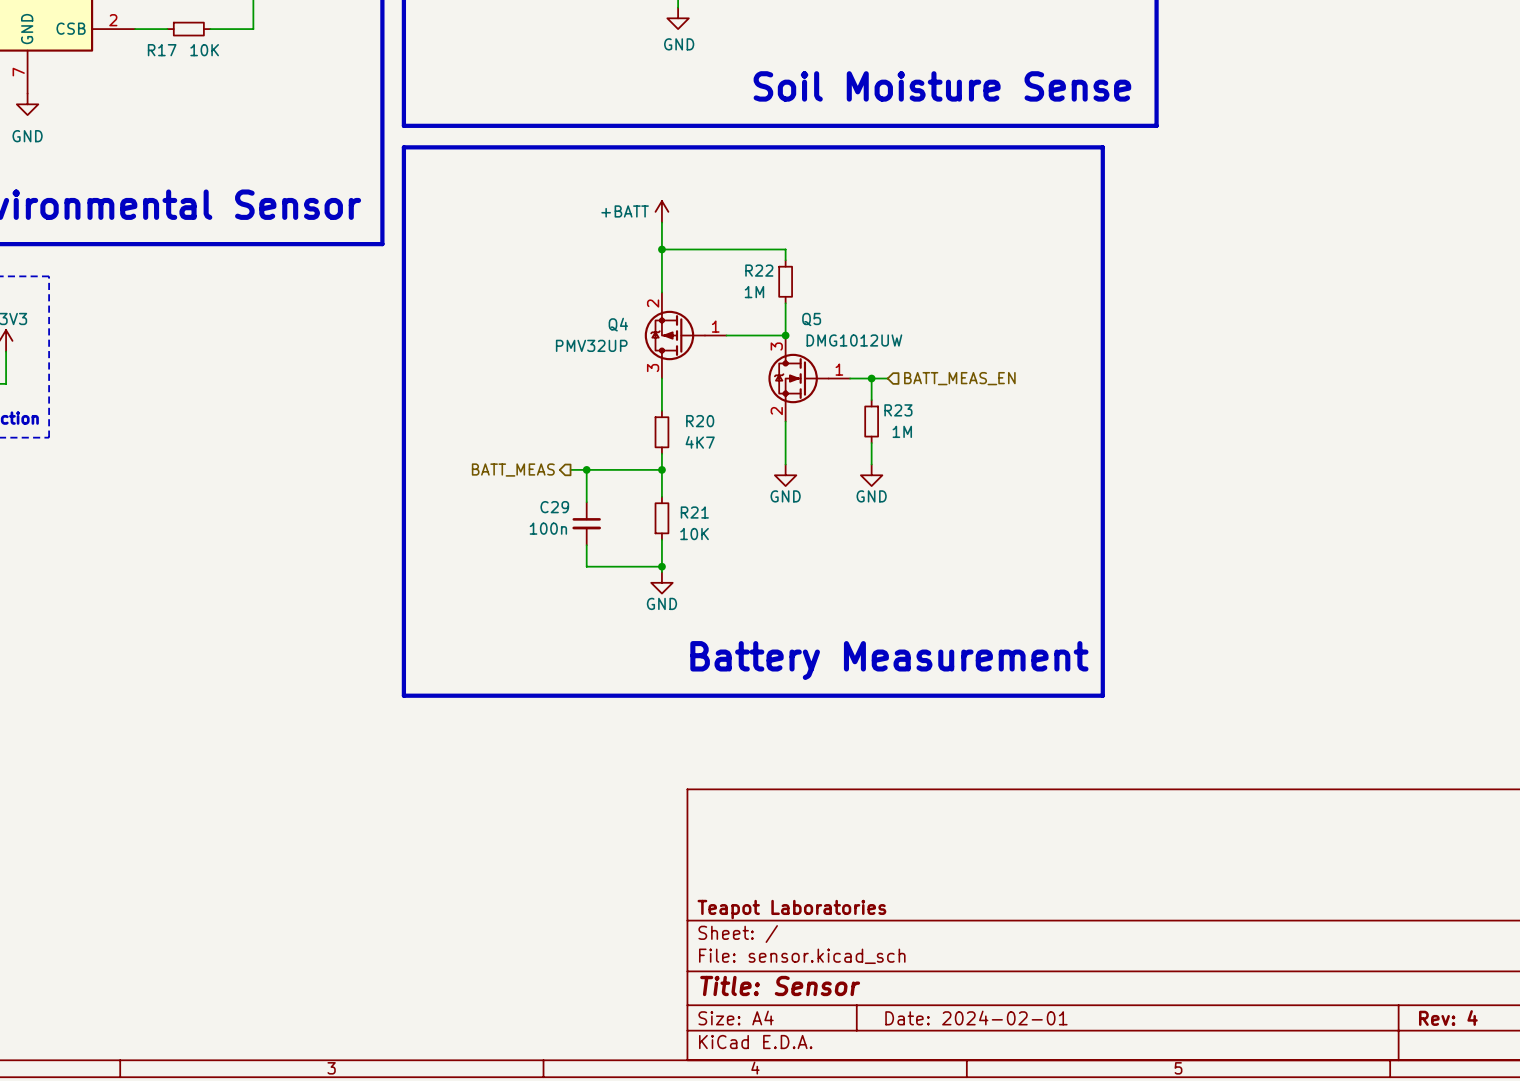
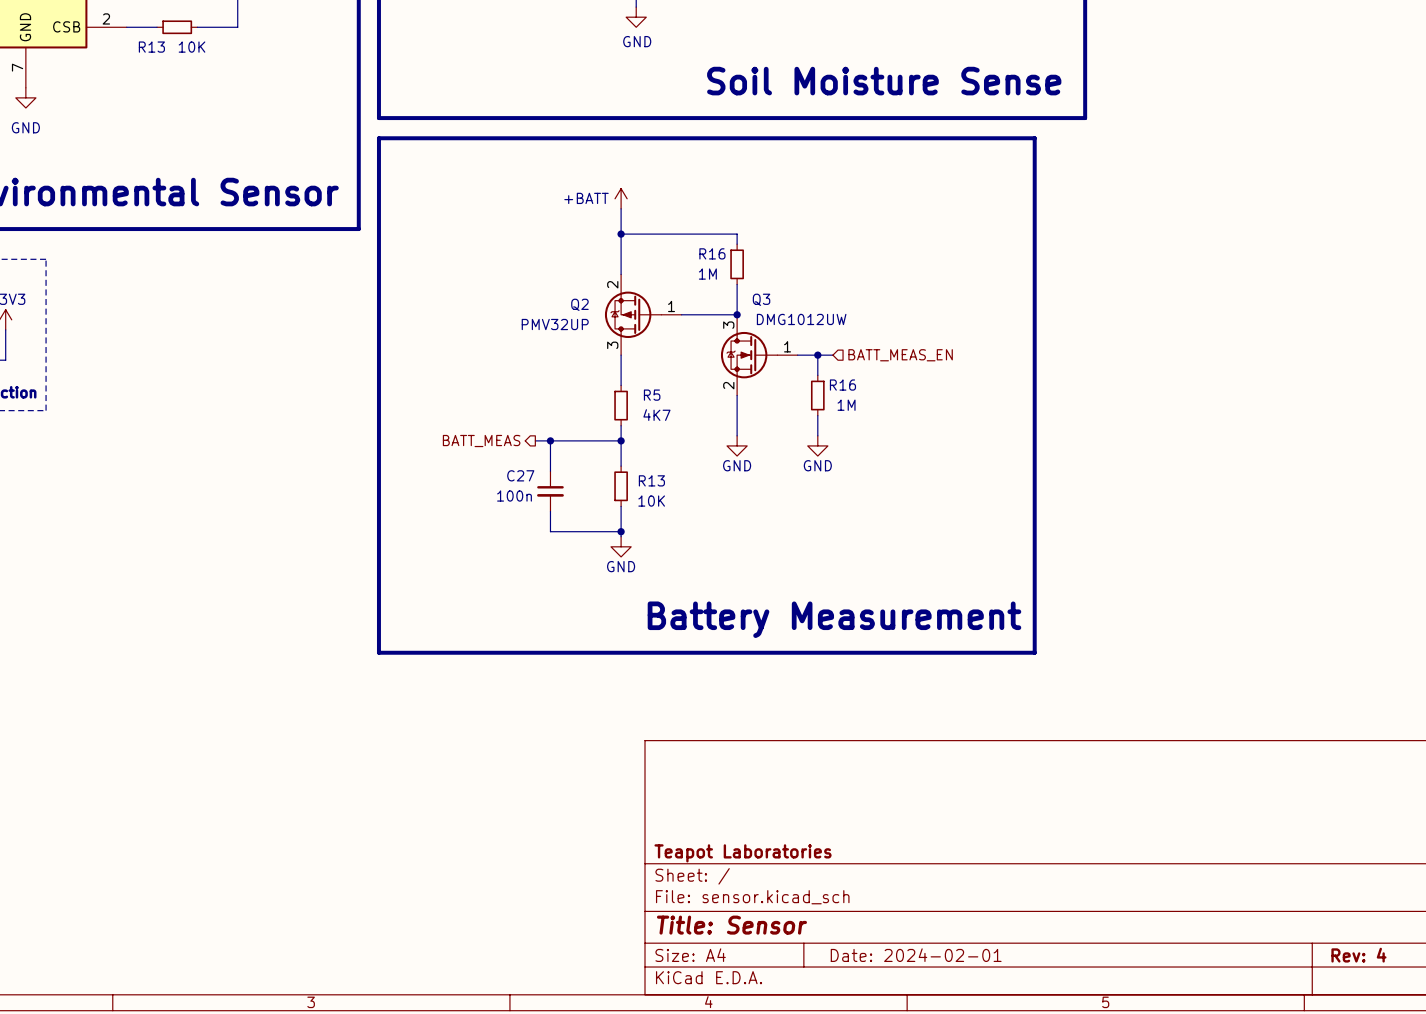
R17 name: R17 (162, 50) -> R13 (151, 47)
R22 name: R22 (759, 270) -> R16 (712, 253)
Q5 name: Q5 (811, 319) -> Q3 (761, 299)
Q4 name: Q4 (618, 324) -> Q2 (579, 304)
R23 name: R23 (898, 410) -> R16 (842, 385)
R20 name: R20 (700, 421) -> R5 (652, 395)
C29 name: C29 (554, 507) -> C27 (520, 475)
R21 name: R21 (694, 512) -> R13 (651, 480)

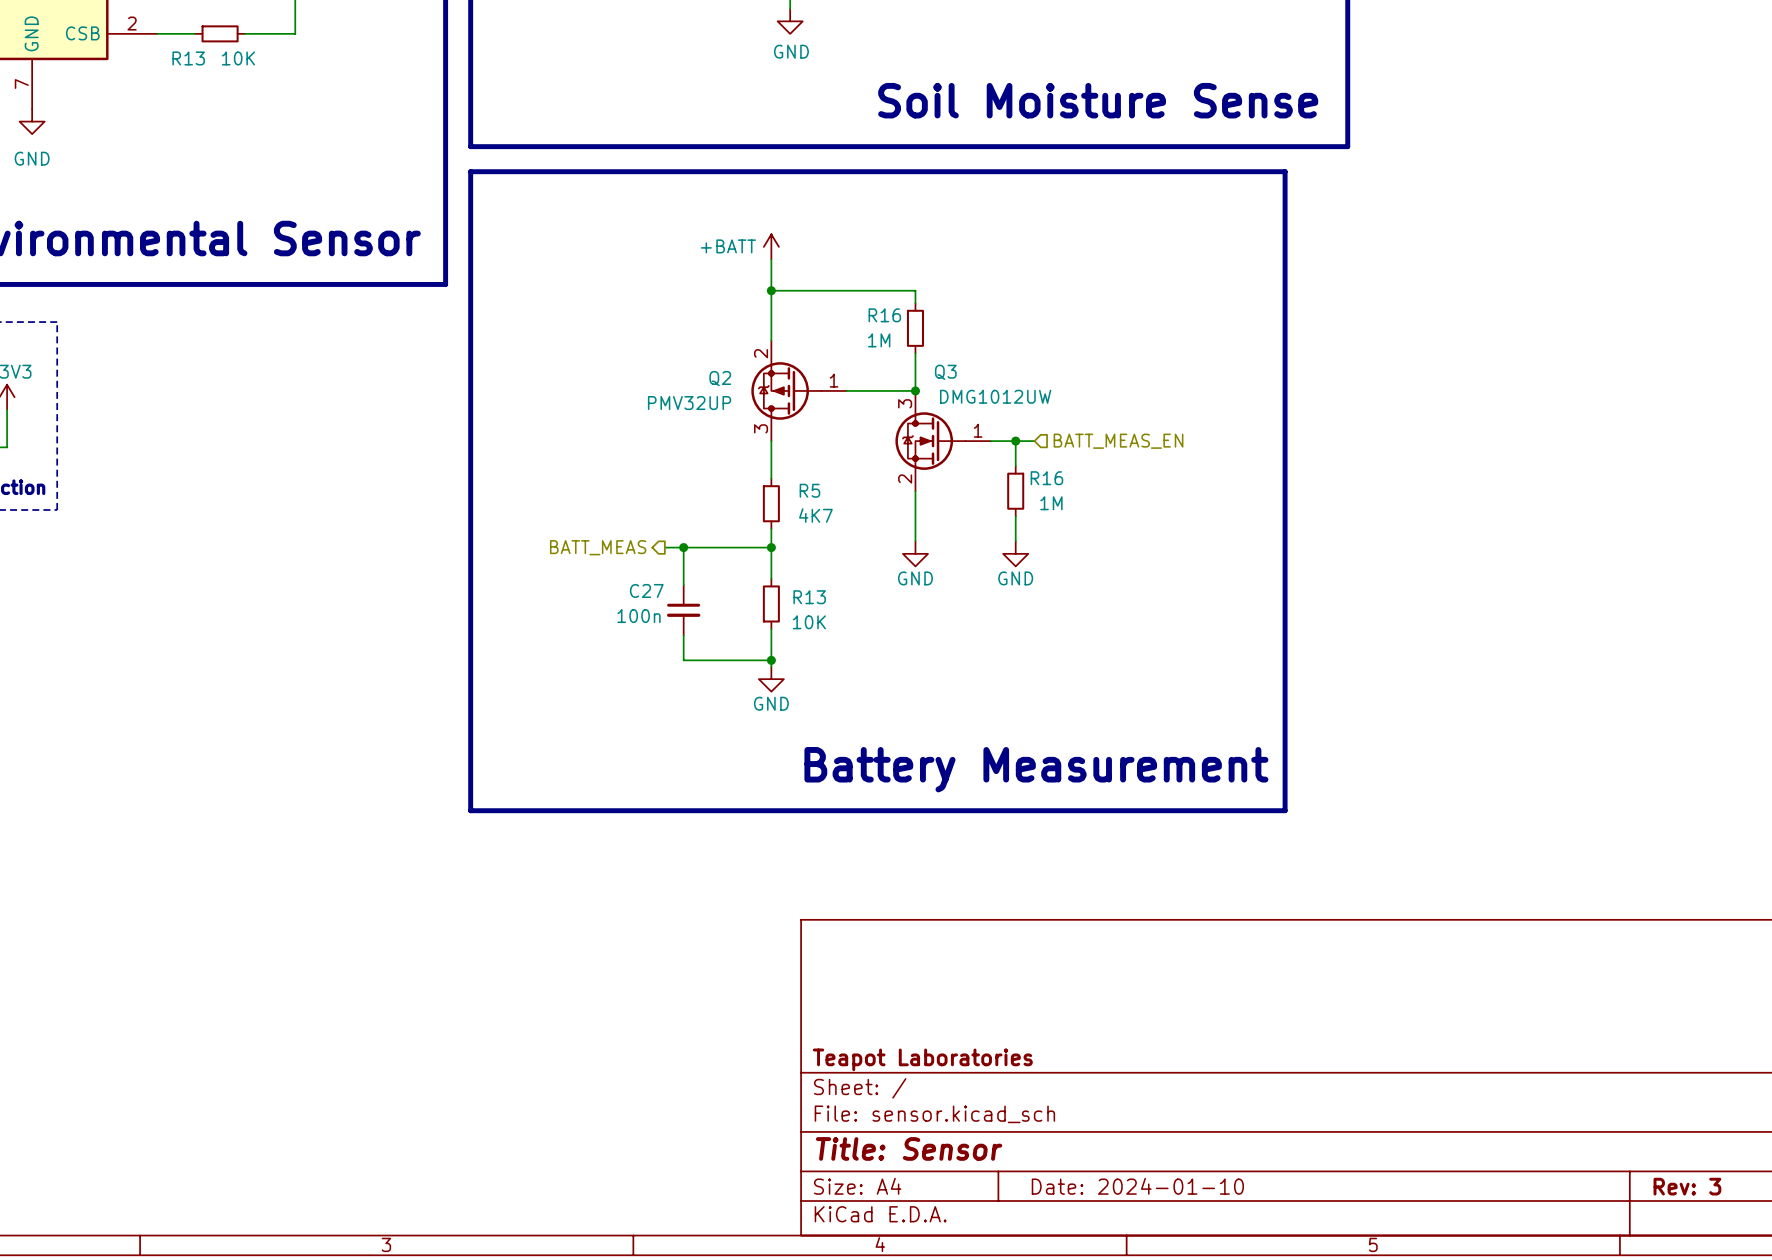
title block: Date: 2024-02-01 (916, 955) -> Date: 2024-01-10 (1137, 1186)
title block: Rev: 4 (1358, 955) -> Rev: 3 (1687, 1186)

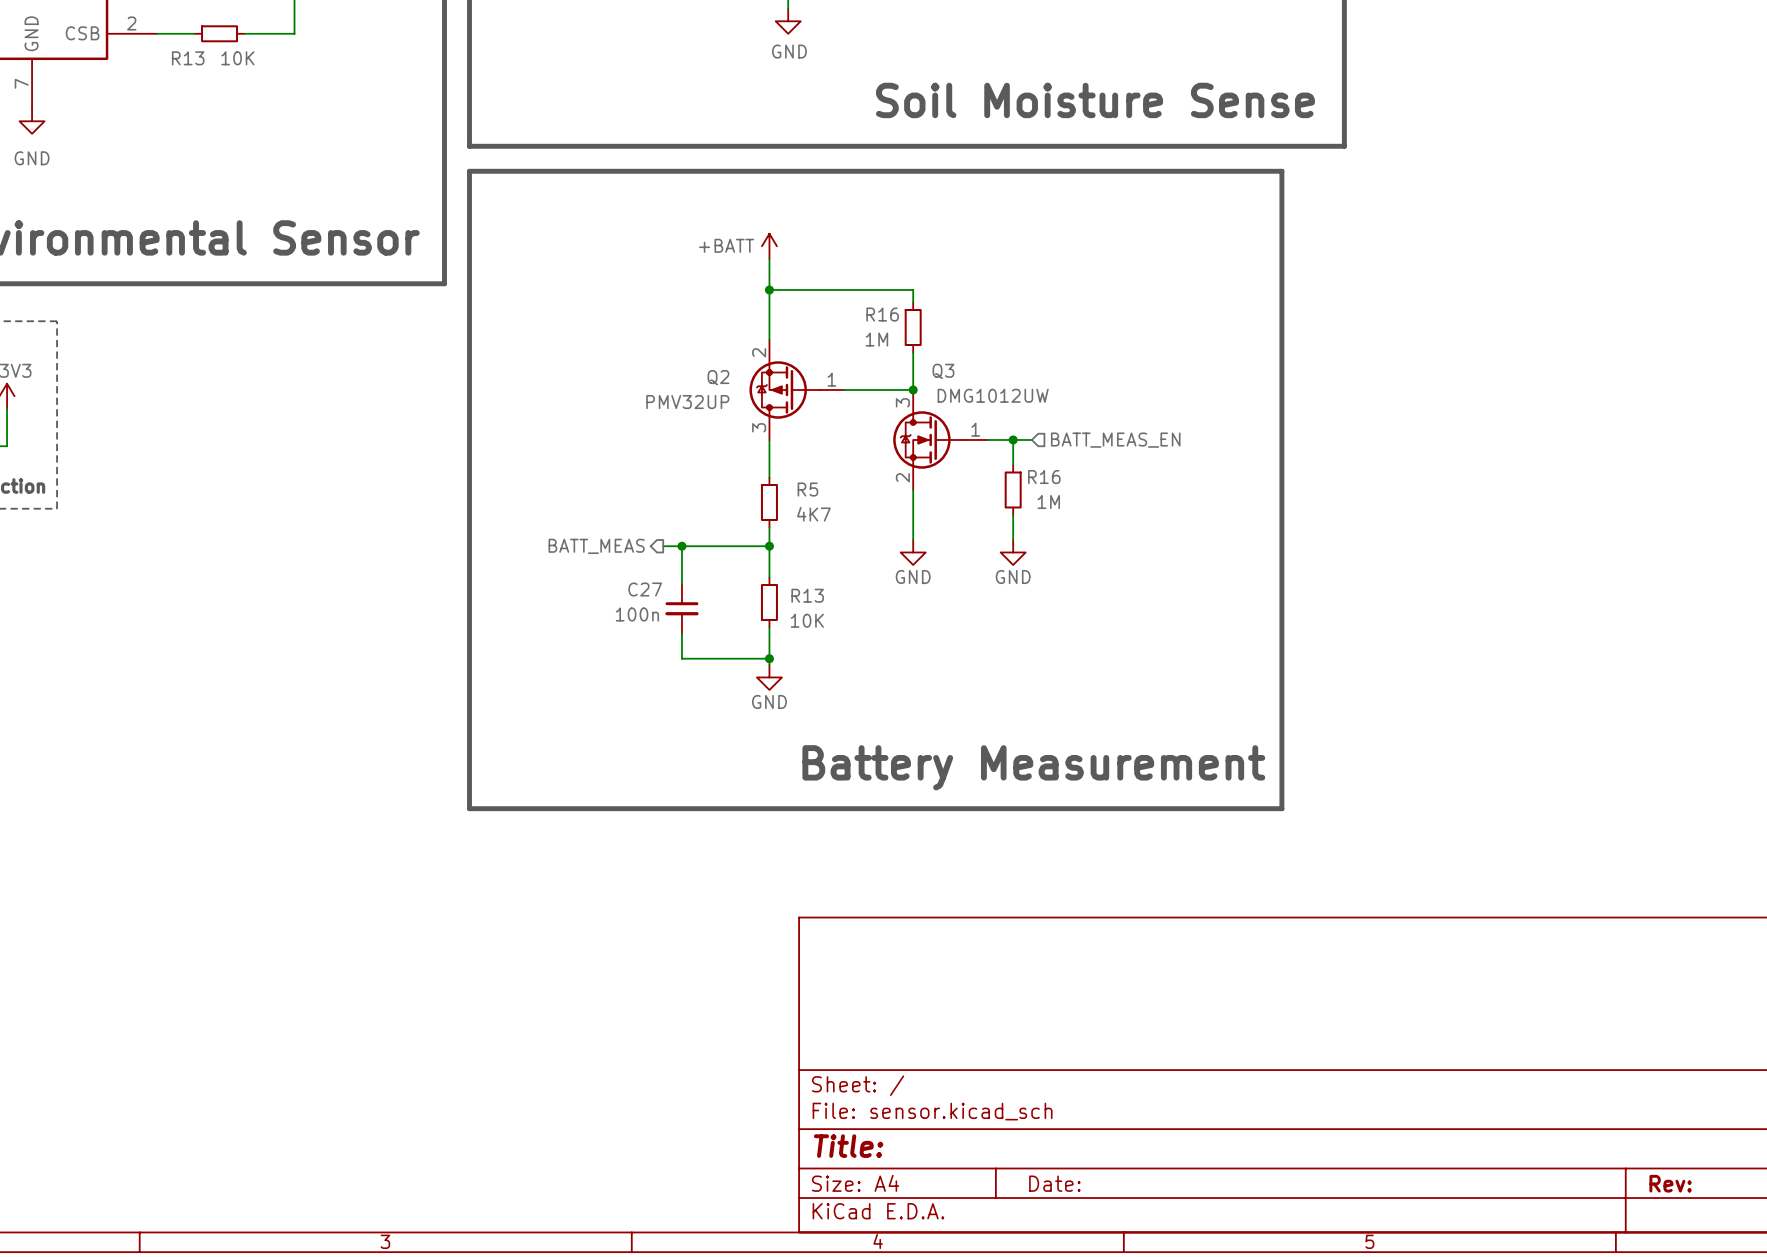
title block: Teapot Laboratories (922, 1059) -> none
title block: Title: Sensor (909, 1148) -> Title: (848, 1146)
title block: Date: 2024-01-10 (1137, 1186) -> Date: (1054, 1183)
title block: Rev: 3 (1687, 1186) -> Rev: (1670, 1183)

